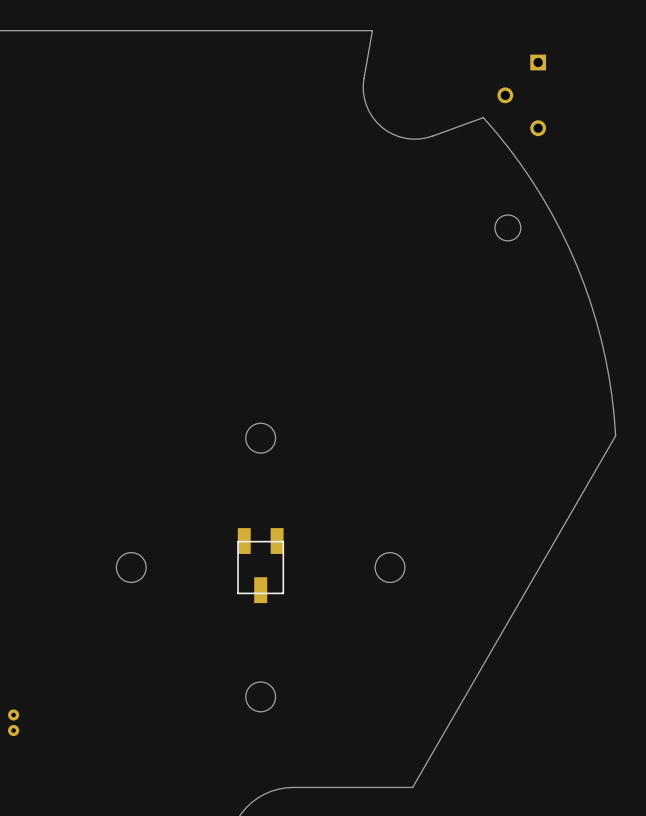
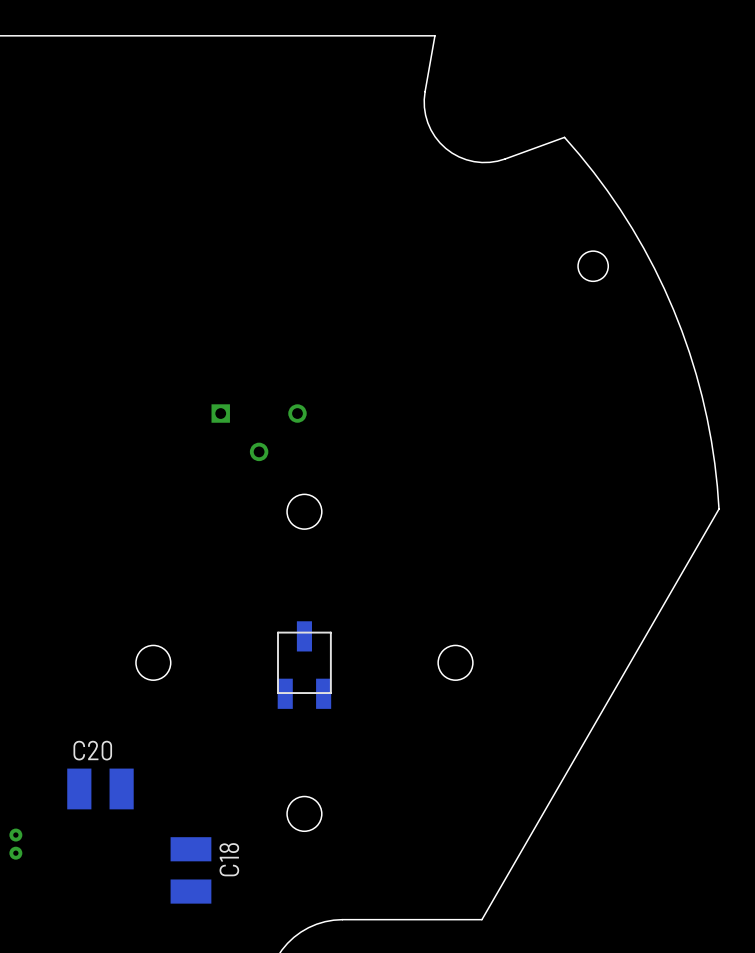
part: (521, 95) -> none
part: none -> (259, 432)
part rotation: 0° (260, 565) -> 180° (304, 665)
C20: none -> (100, 788)
C18: none -> (190, 870)

